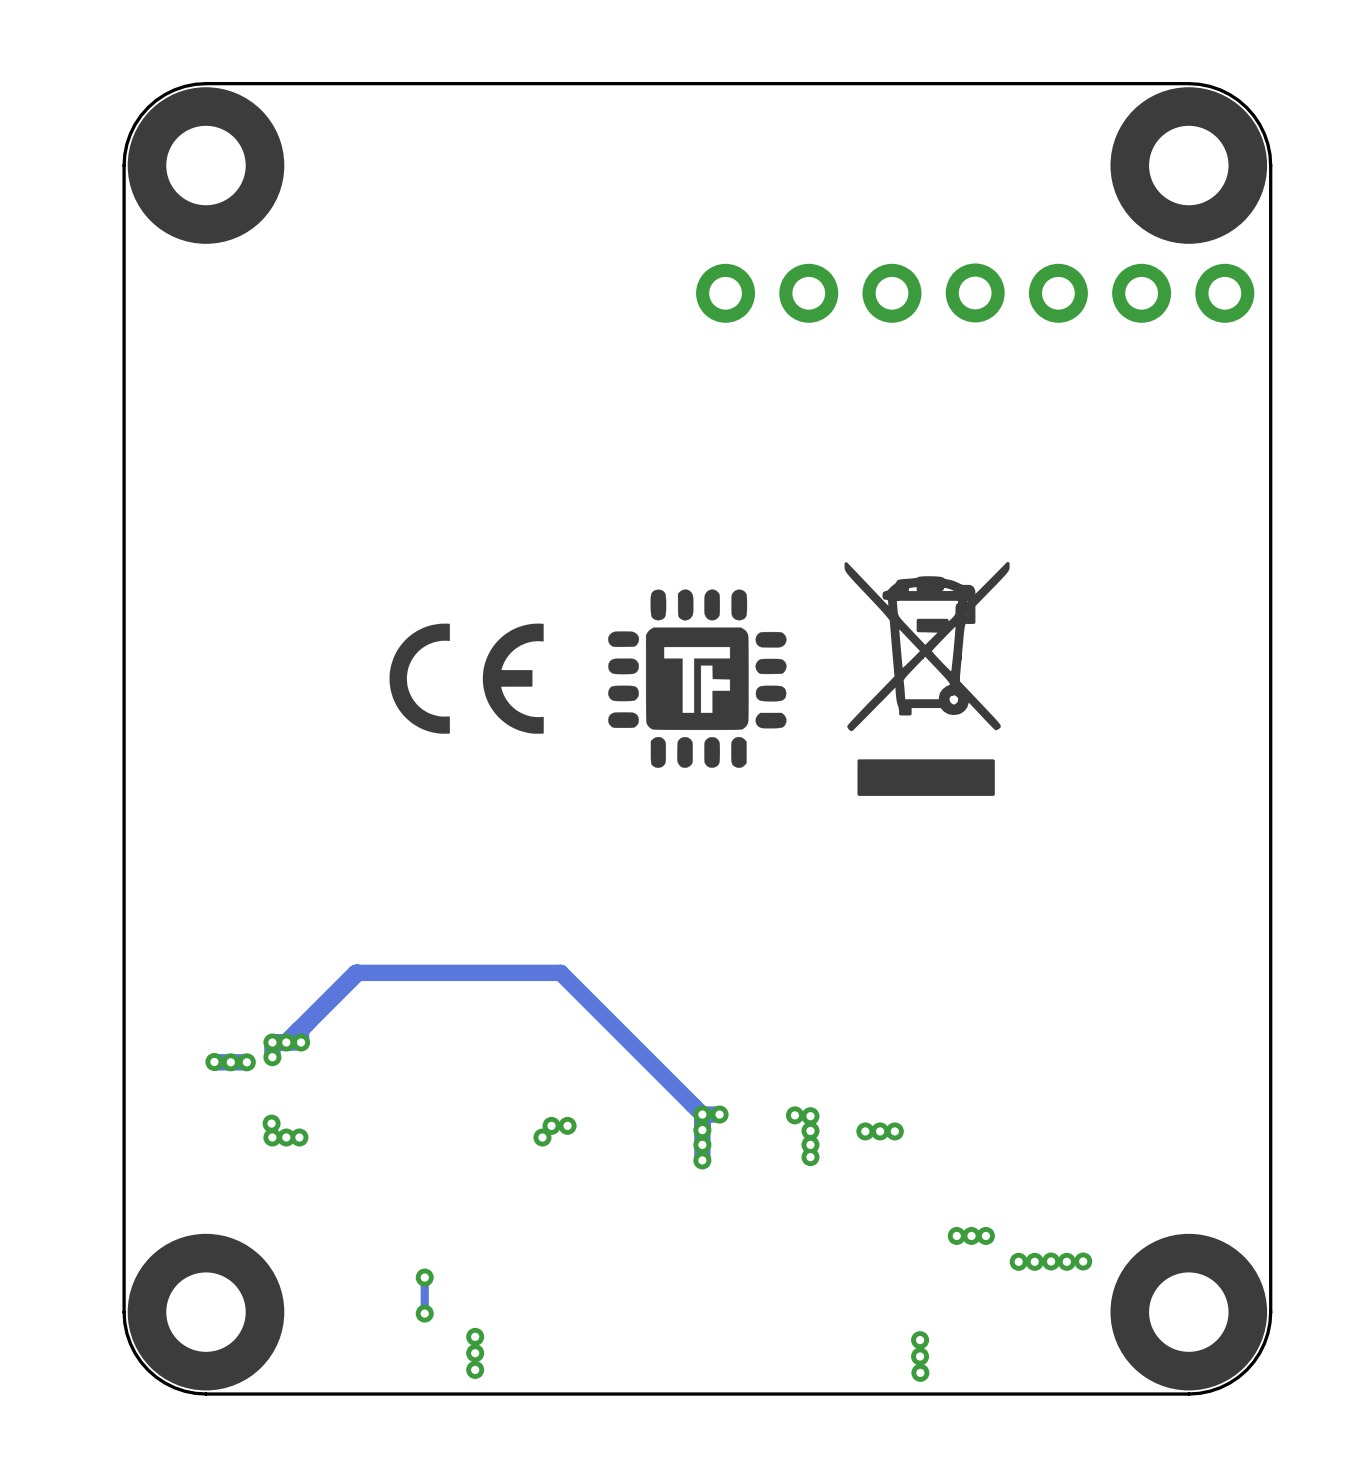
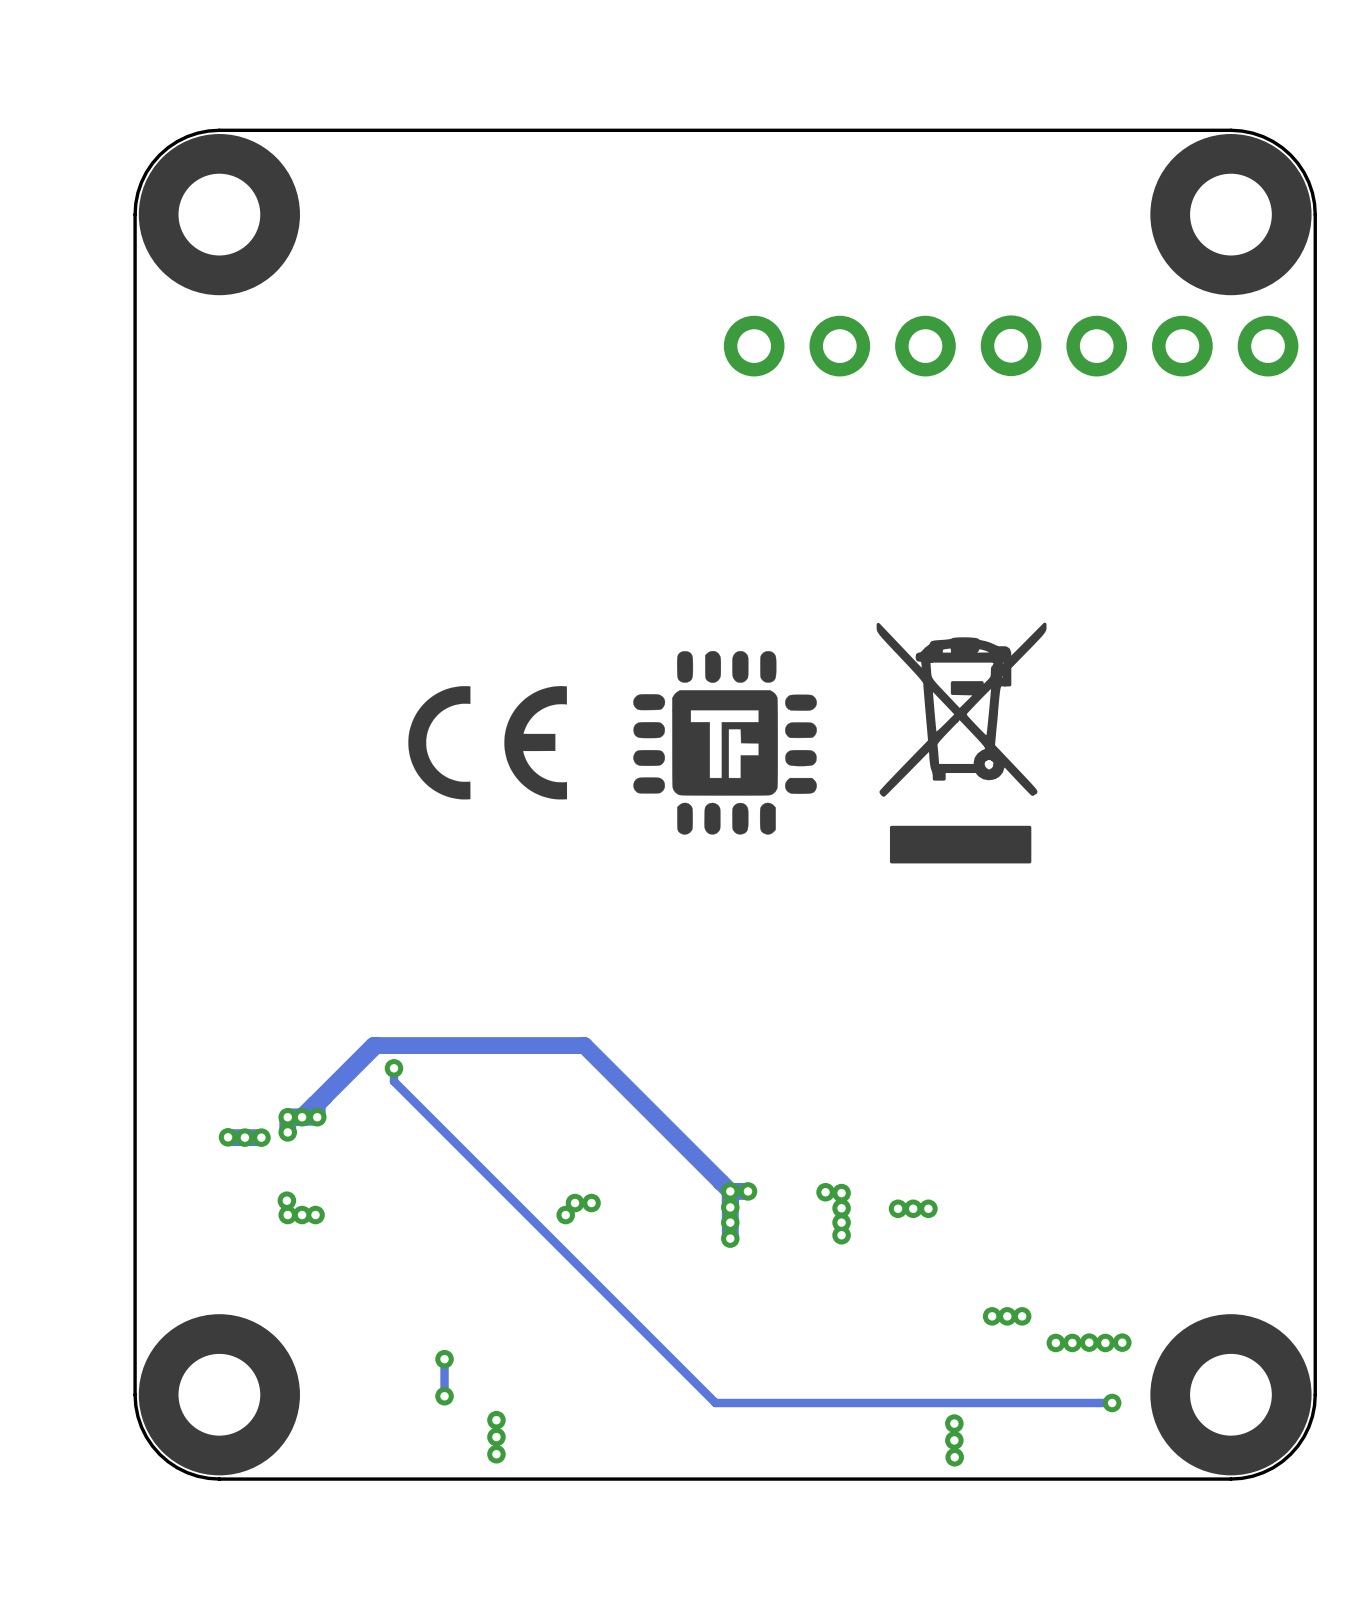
track: none -> (392, 1067) (394, 1068) (394, 1081) (715, 1403) (1112, 1403)
via: none -> (394, 1068)
via: none -> (1112, 1403)

